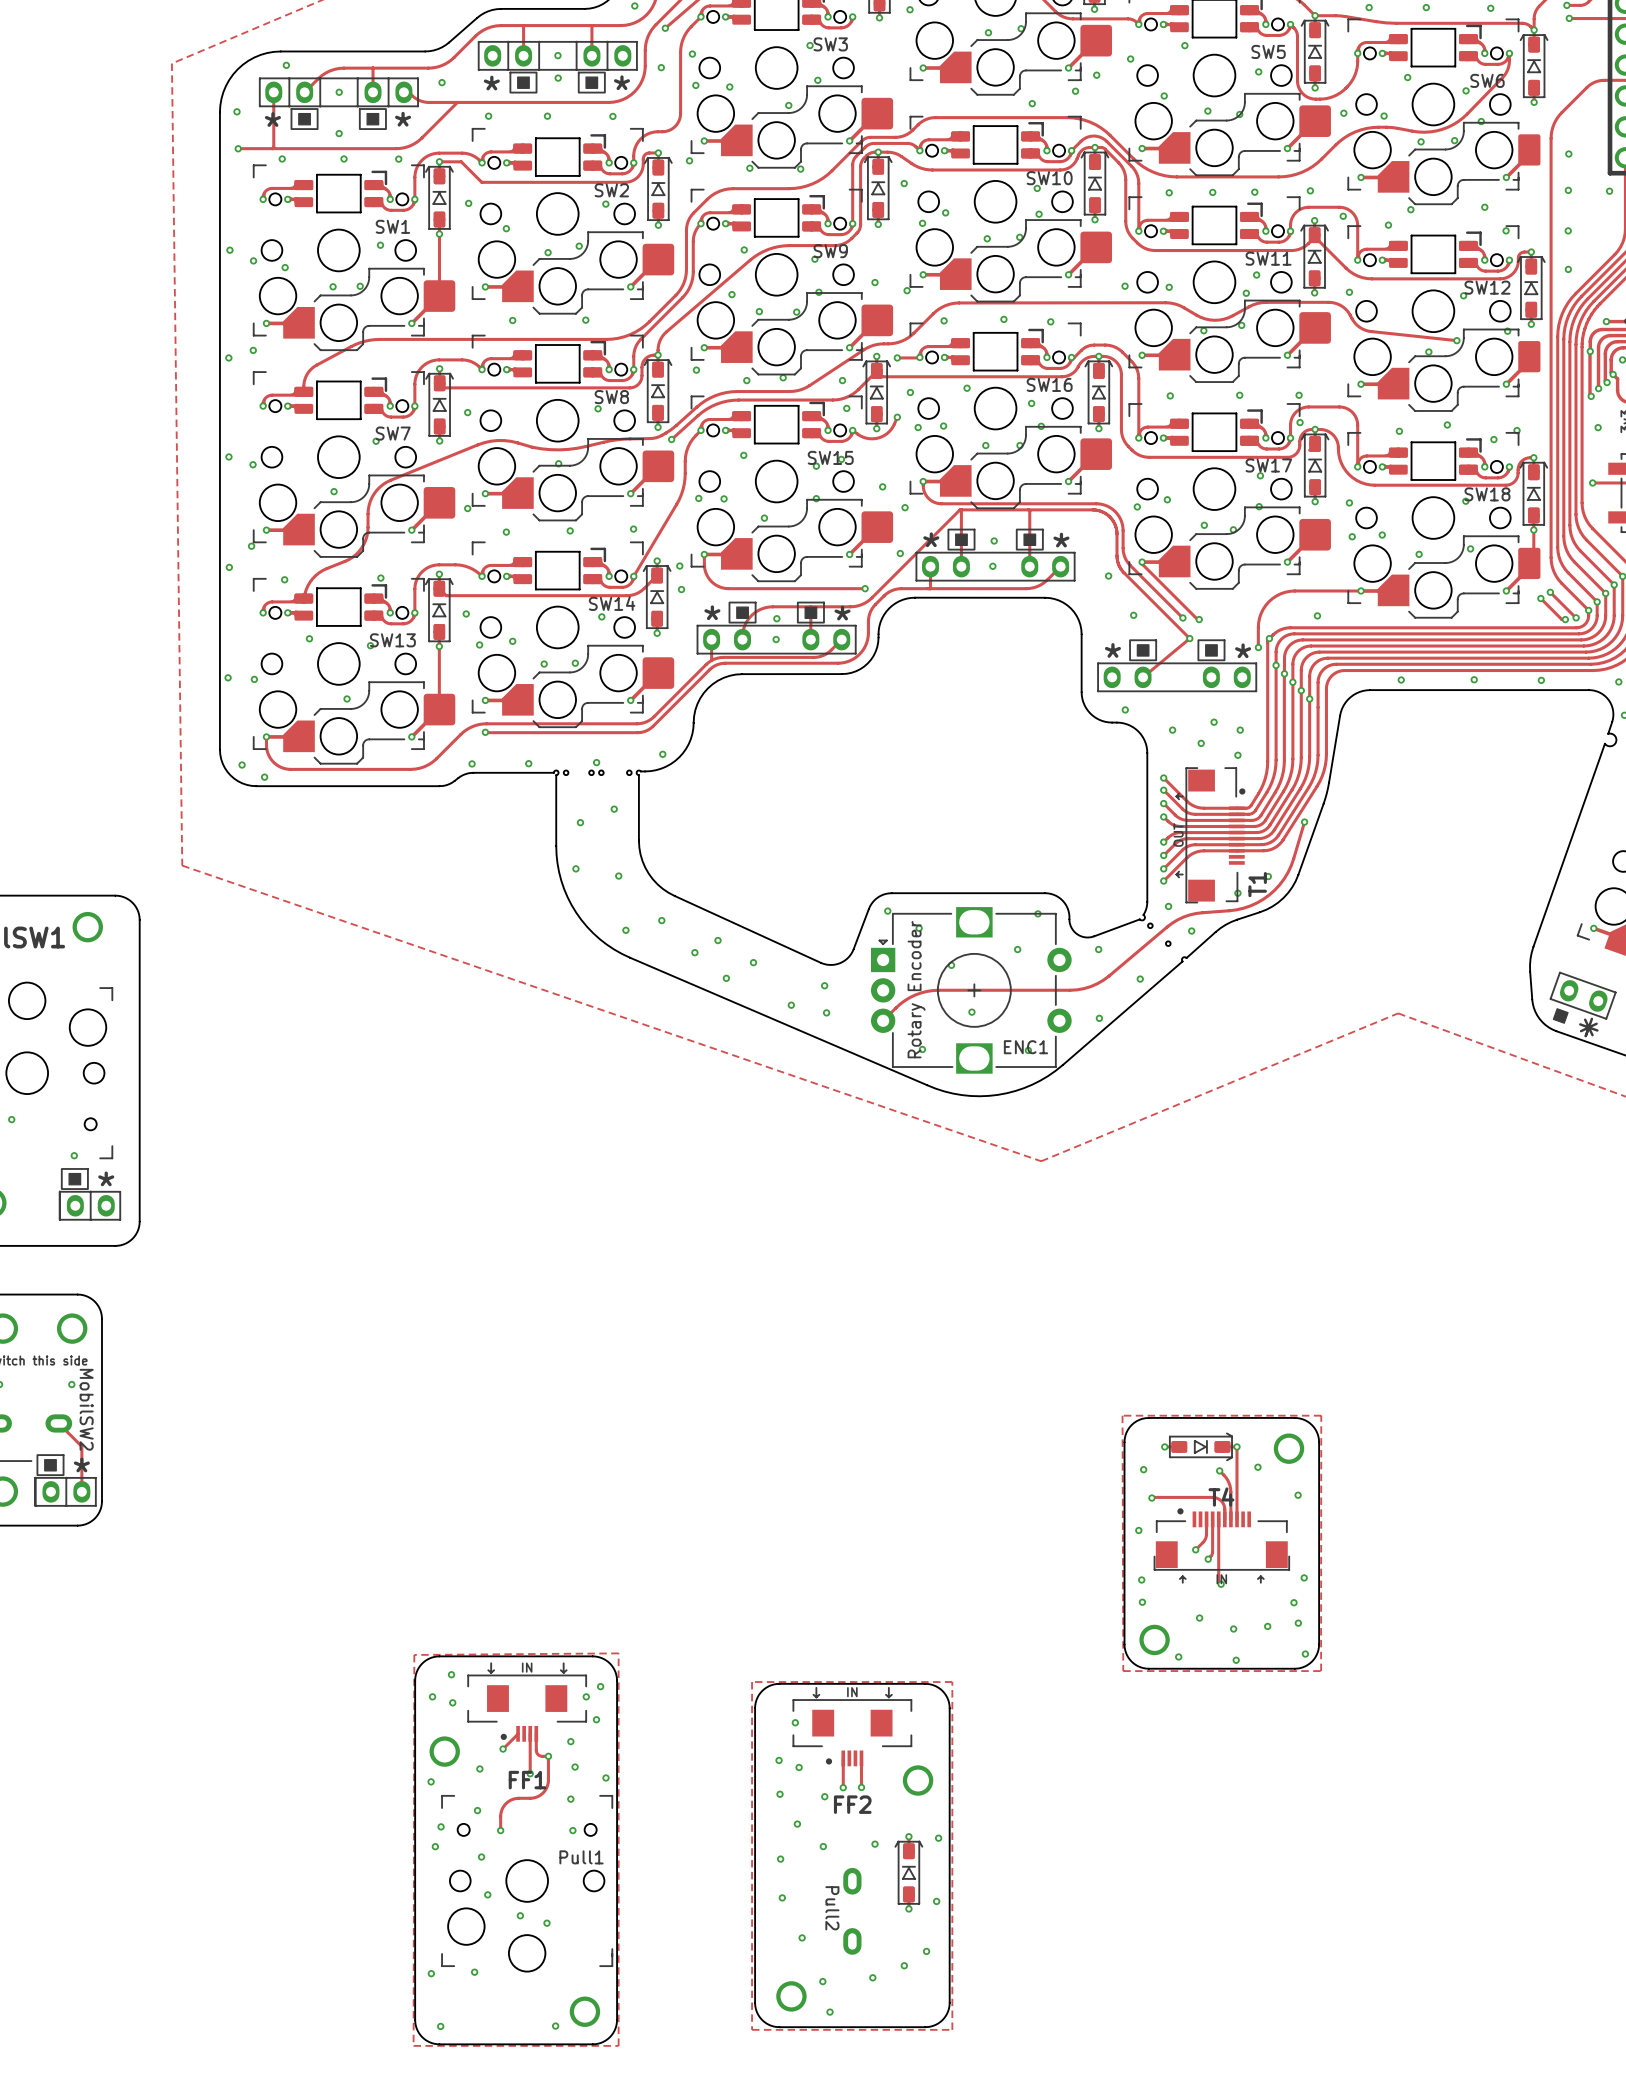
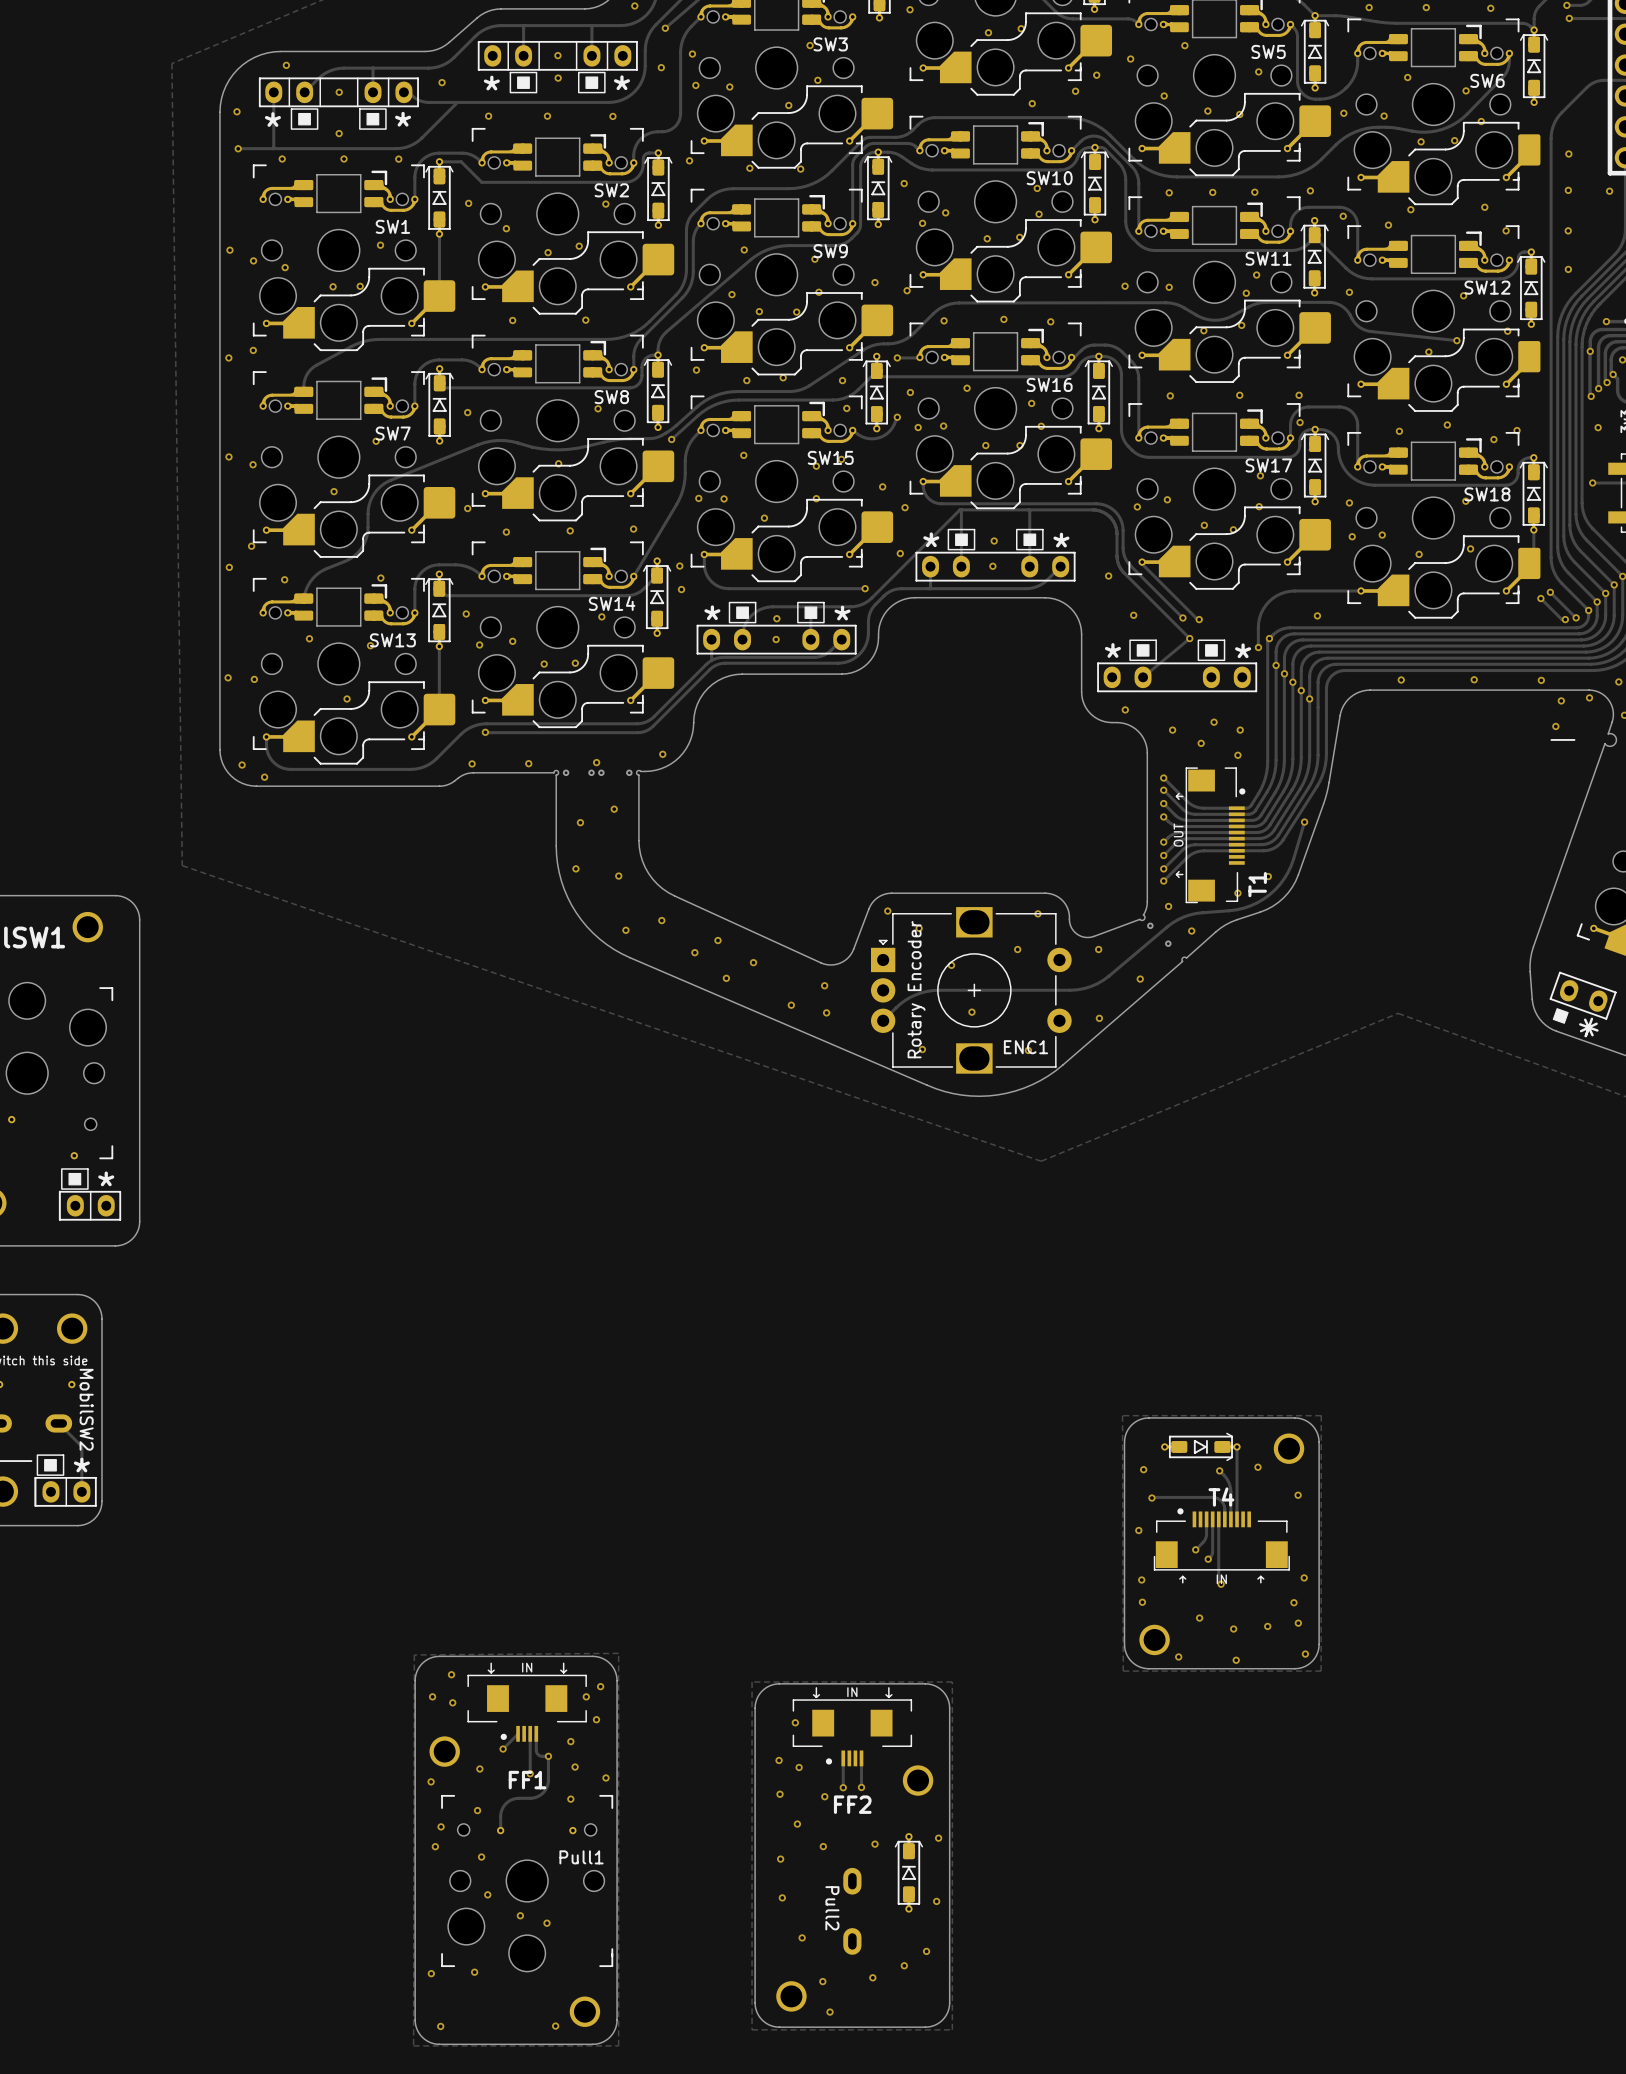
via: none -> (1589, 697)
via: none -> (1561, 700)
via: none -> (1555, 726)
line: none -> (1551, 739) (1574, 739)

